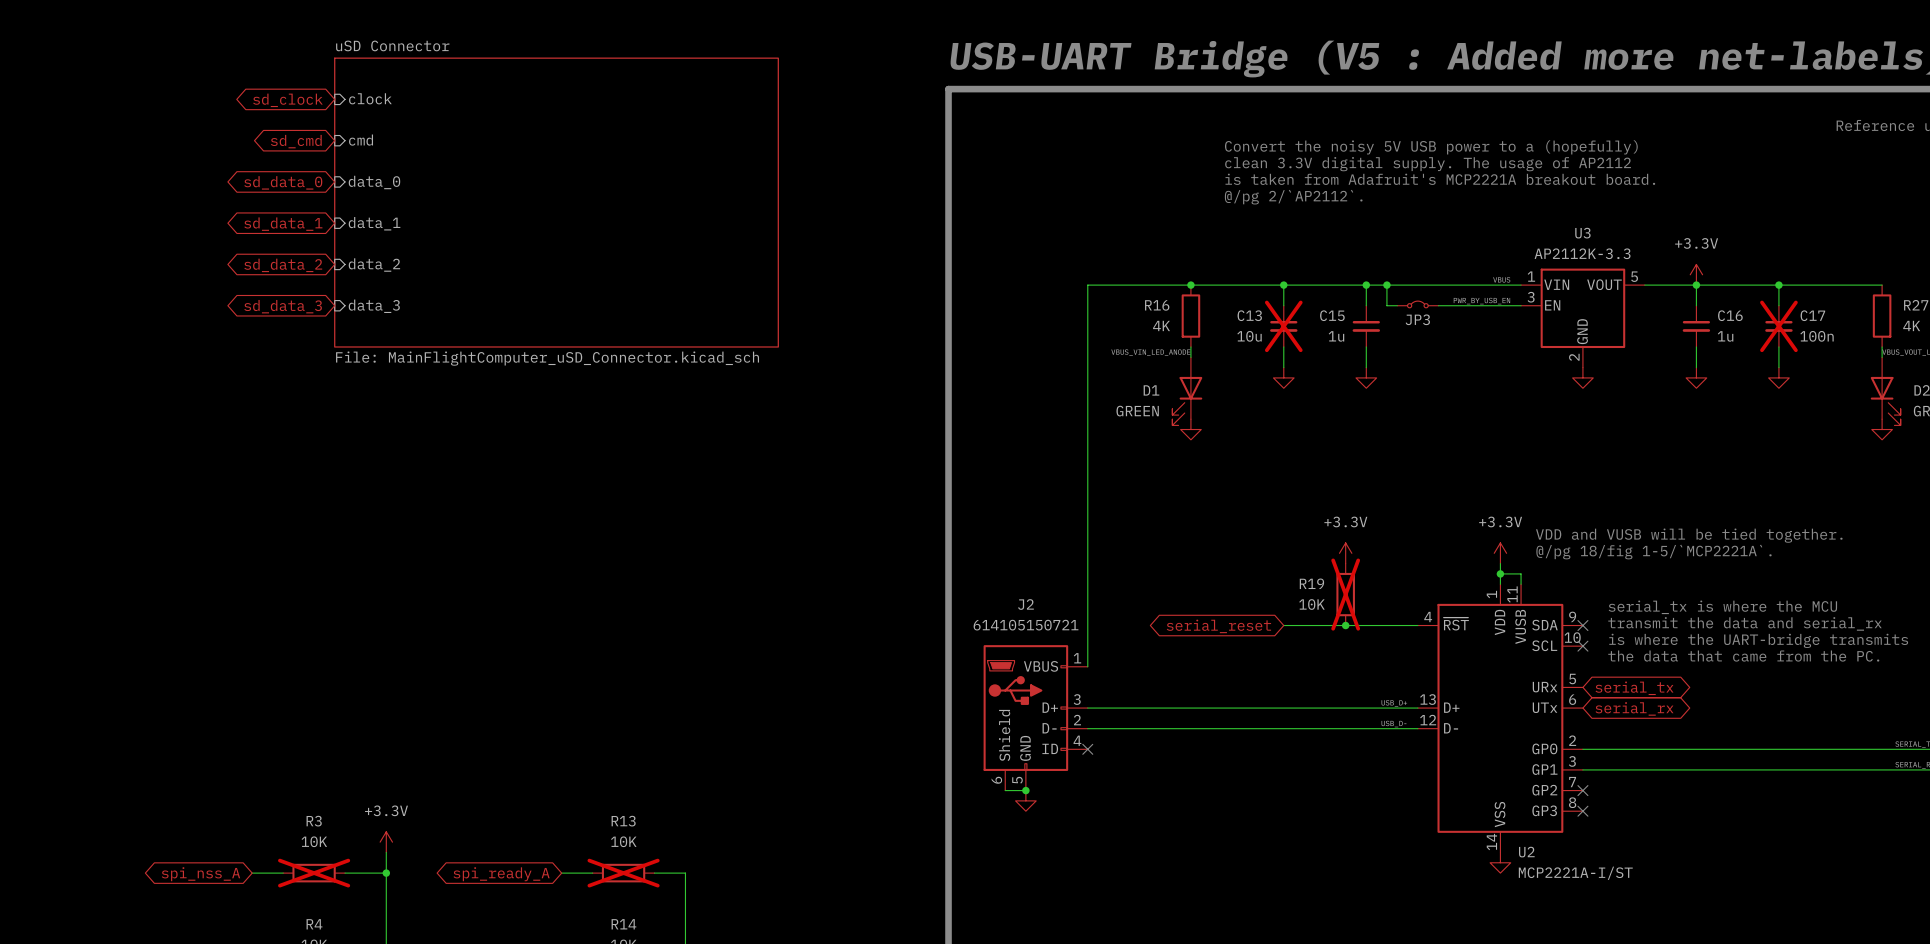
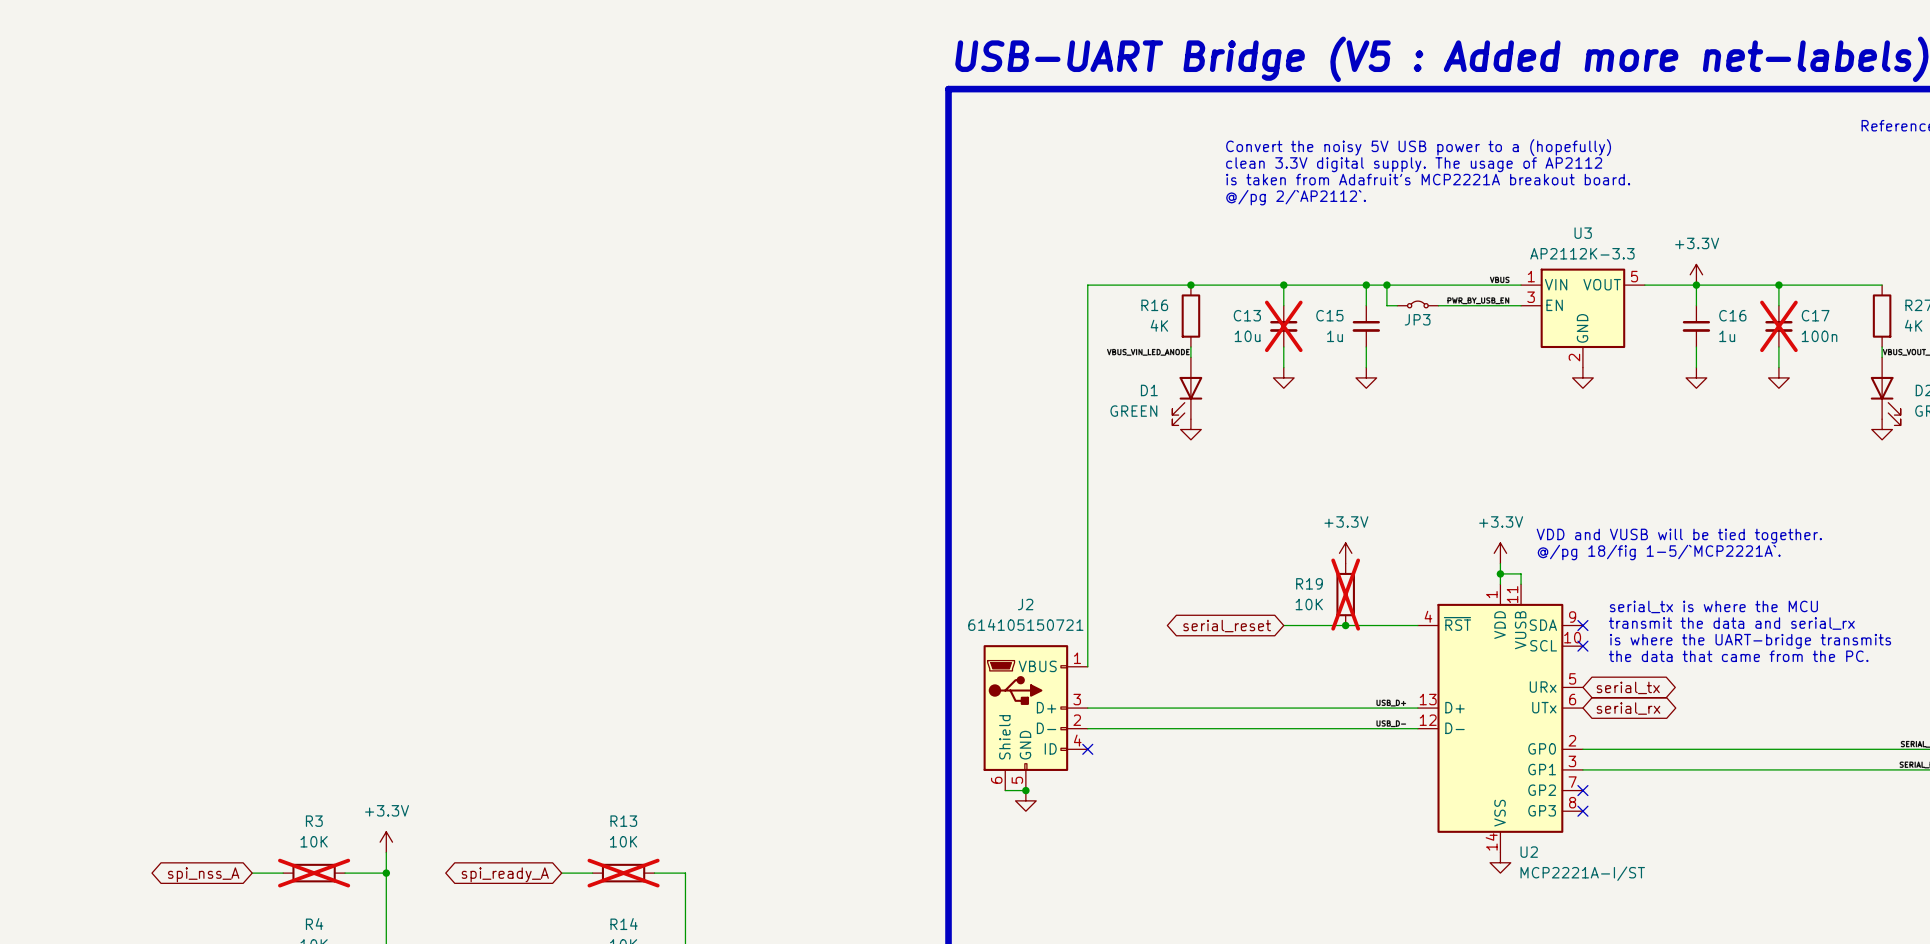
sheet pin: clock (370, 98) -> none
global label: sd_clock (287, 100) -> none
sheet pin: cmd (361, 140) -> none
global label: sd_cmd (296, 141) -> none
global label: sd_data_0 (283, 182) -> none
sheet pin: data_0 (374, 182) -> none
sheet uSD Connector: File: MainFlightComputer_uSD_Connector.kicad_sch (556, 202) -> none
sheet pin: data_1 (374, 223) -> none
global label: sd_data_1 (283, 224) -> none
global label: sd_data_2 (283, 265) -> none
sheet pin: data_2 (374, 265) -> none
global label: sd_data_3 (283, 306) -> none
sheet pin: data_3 (374, 306) -> none

